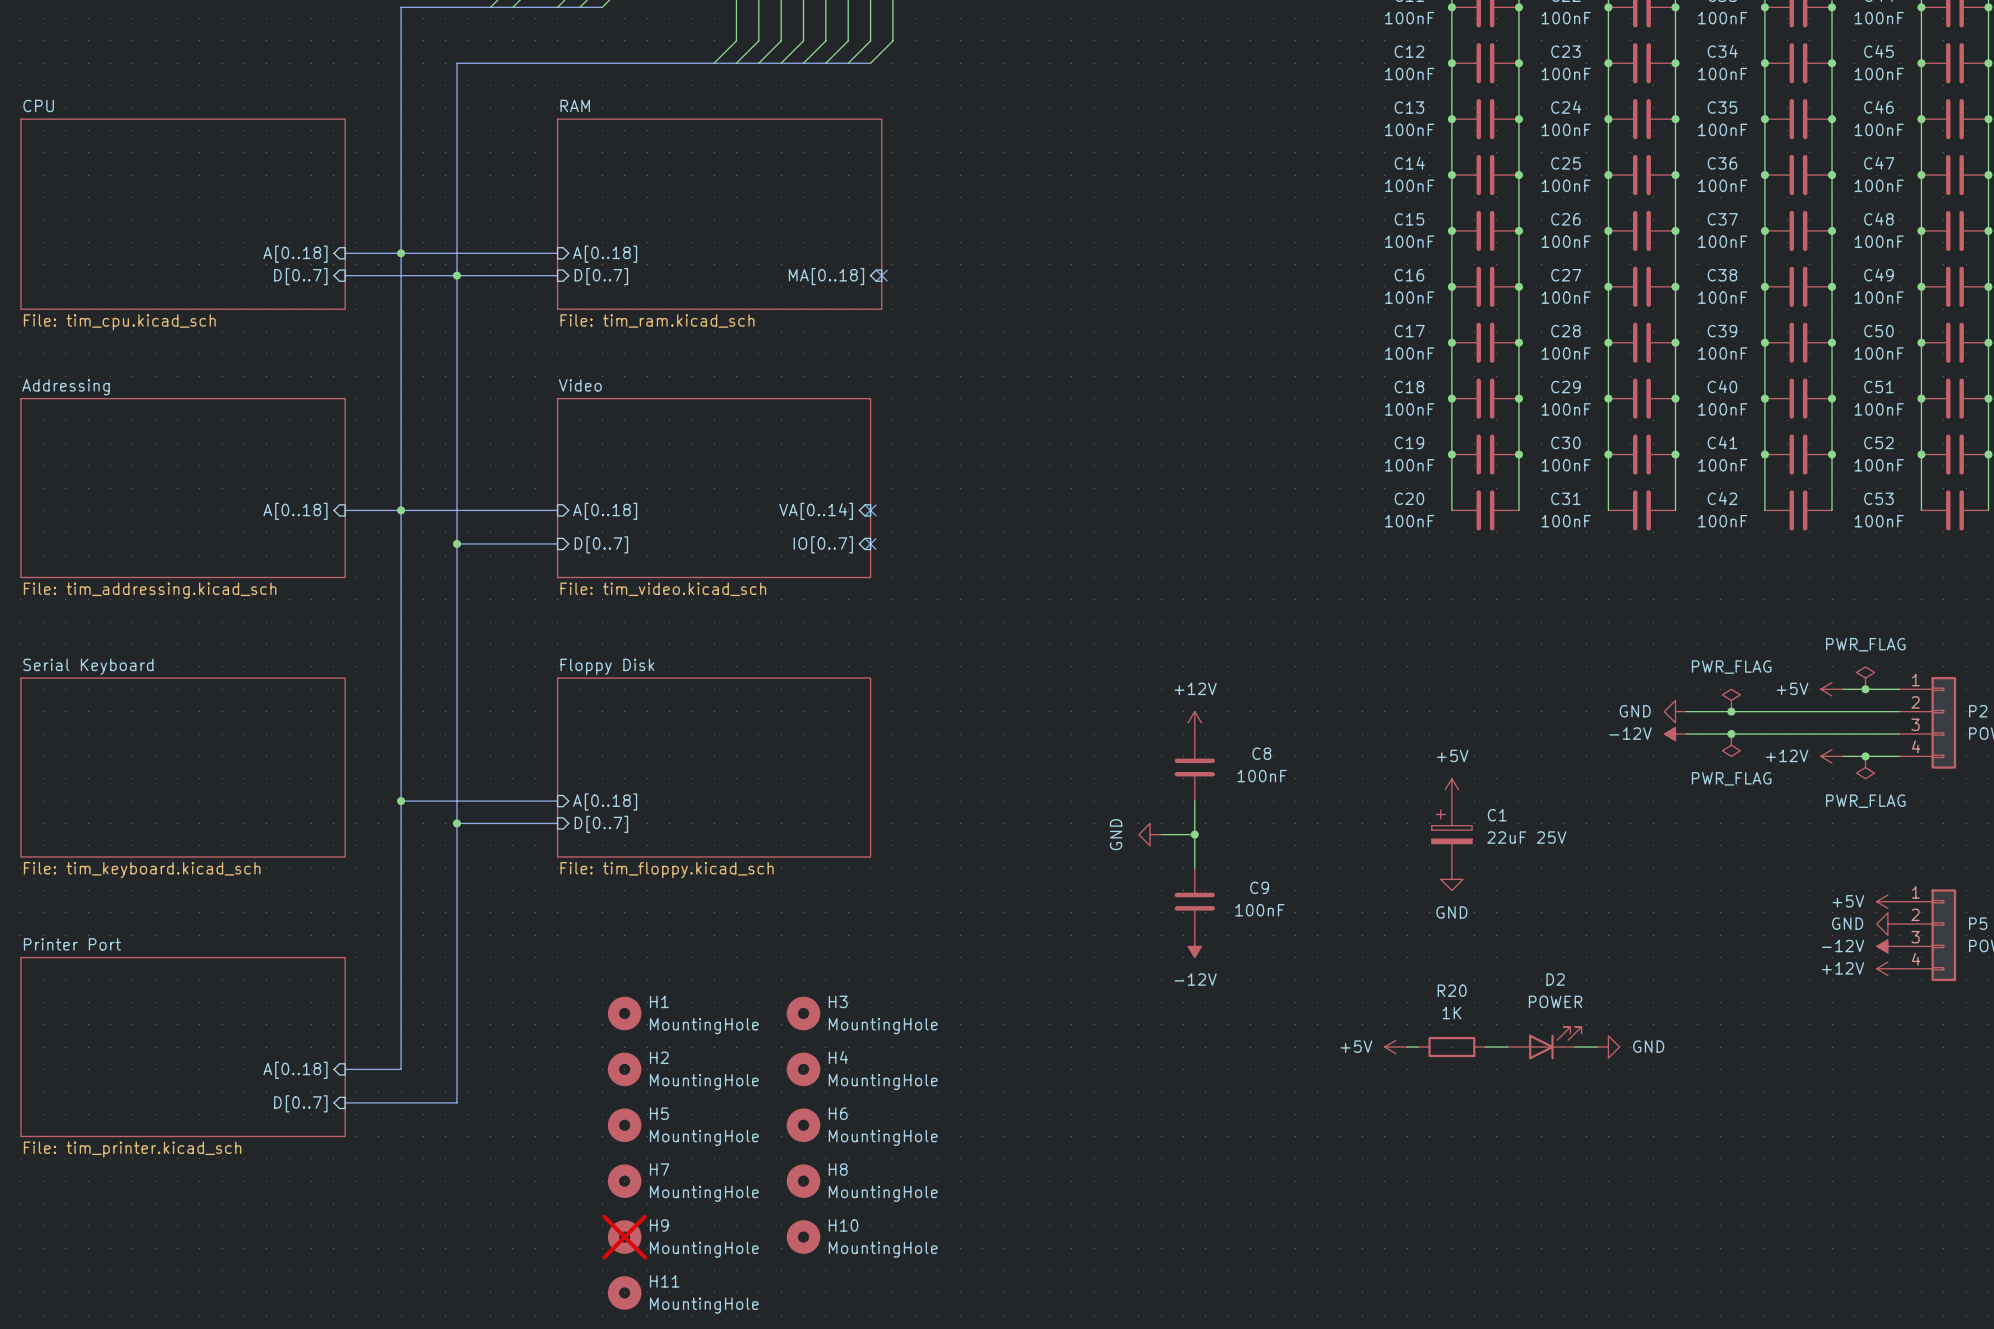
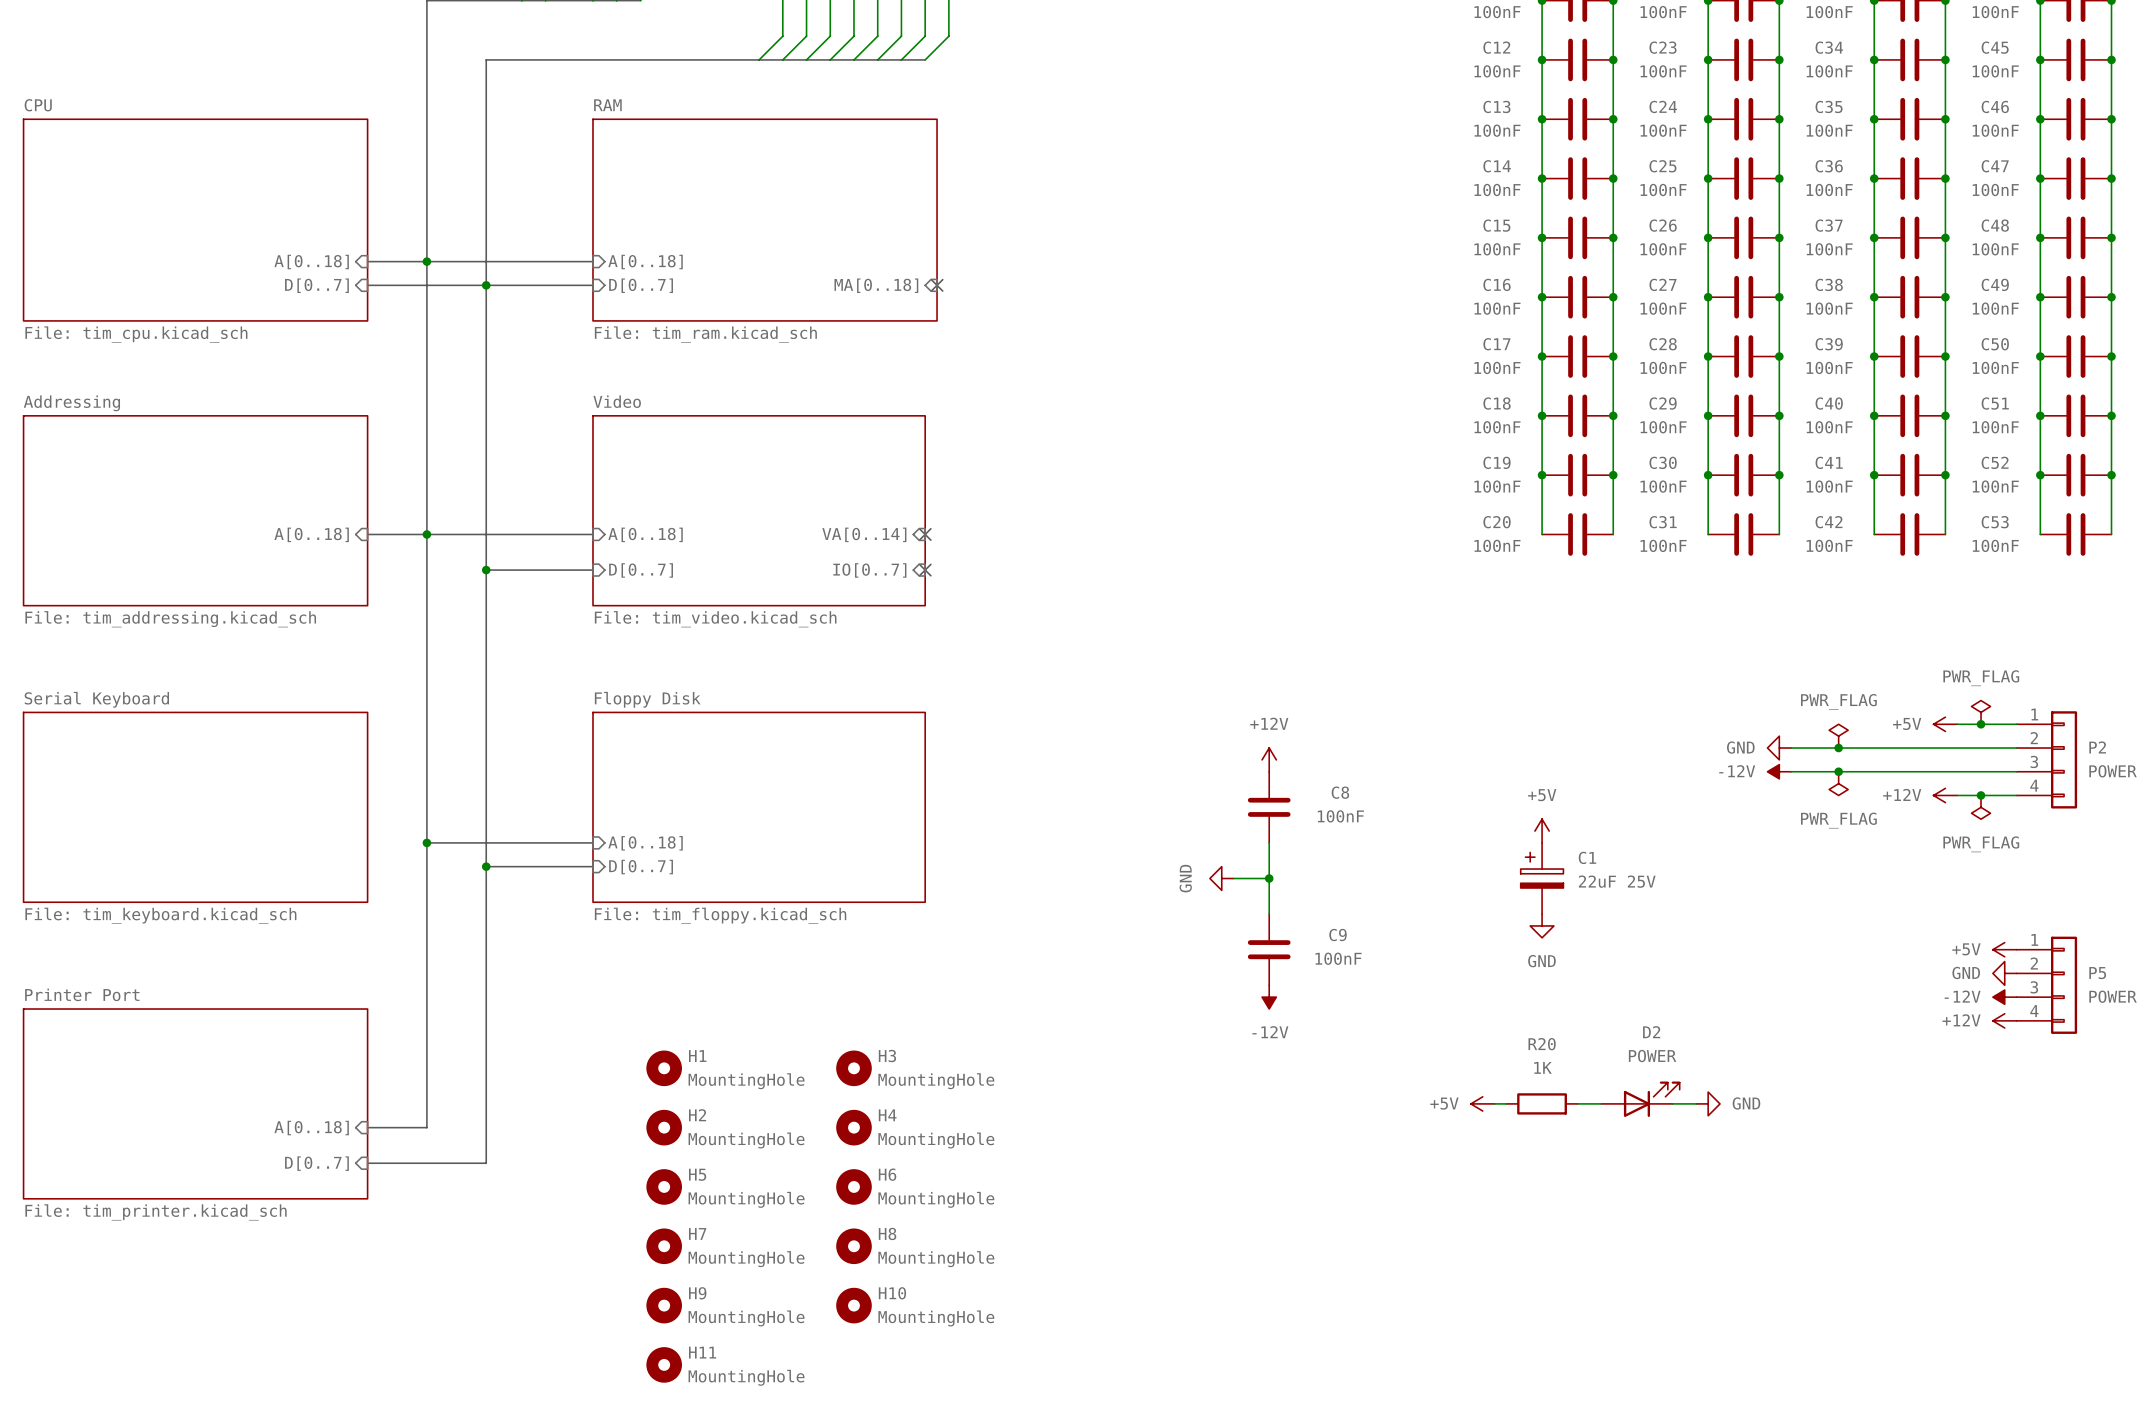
H9 do-not-place cross: (624, 1237) -> none

